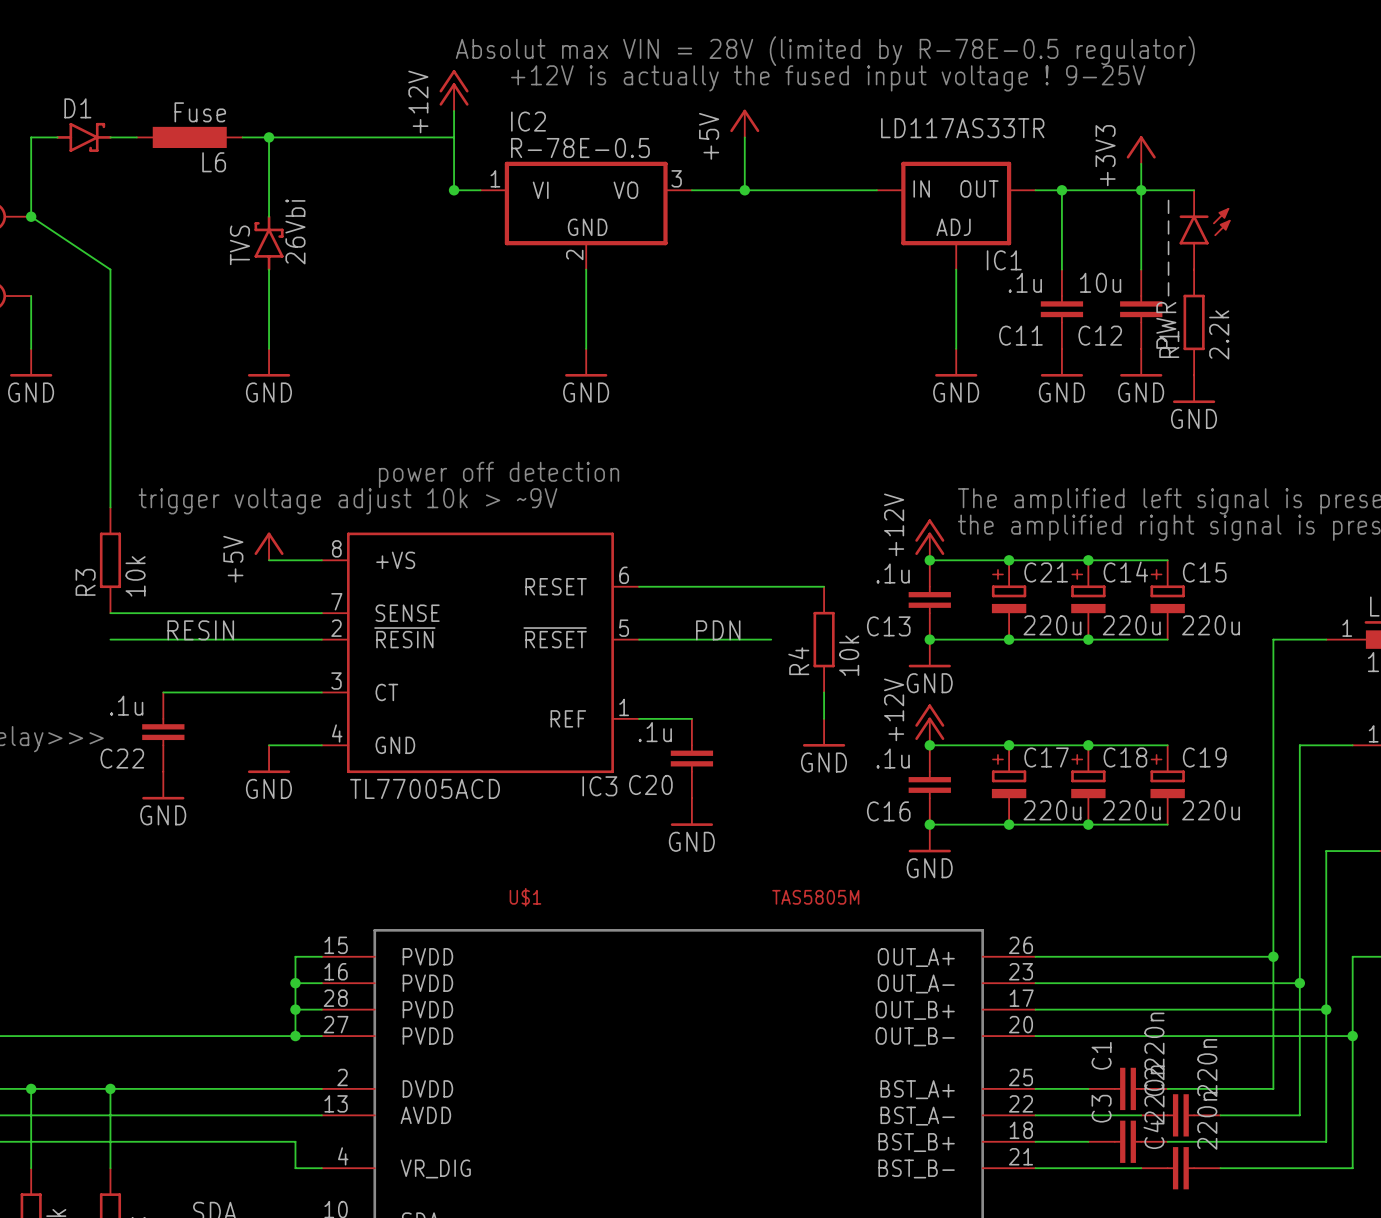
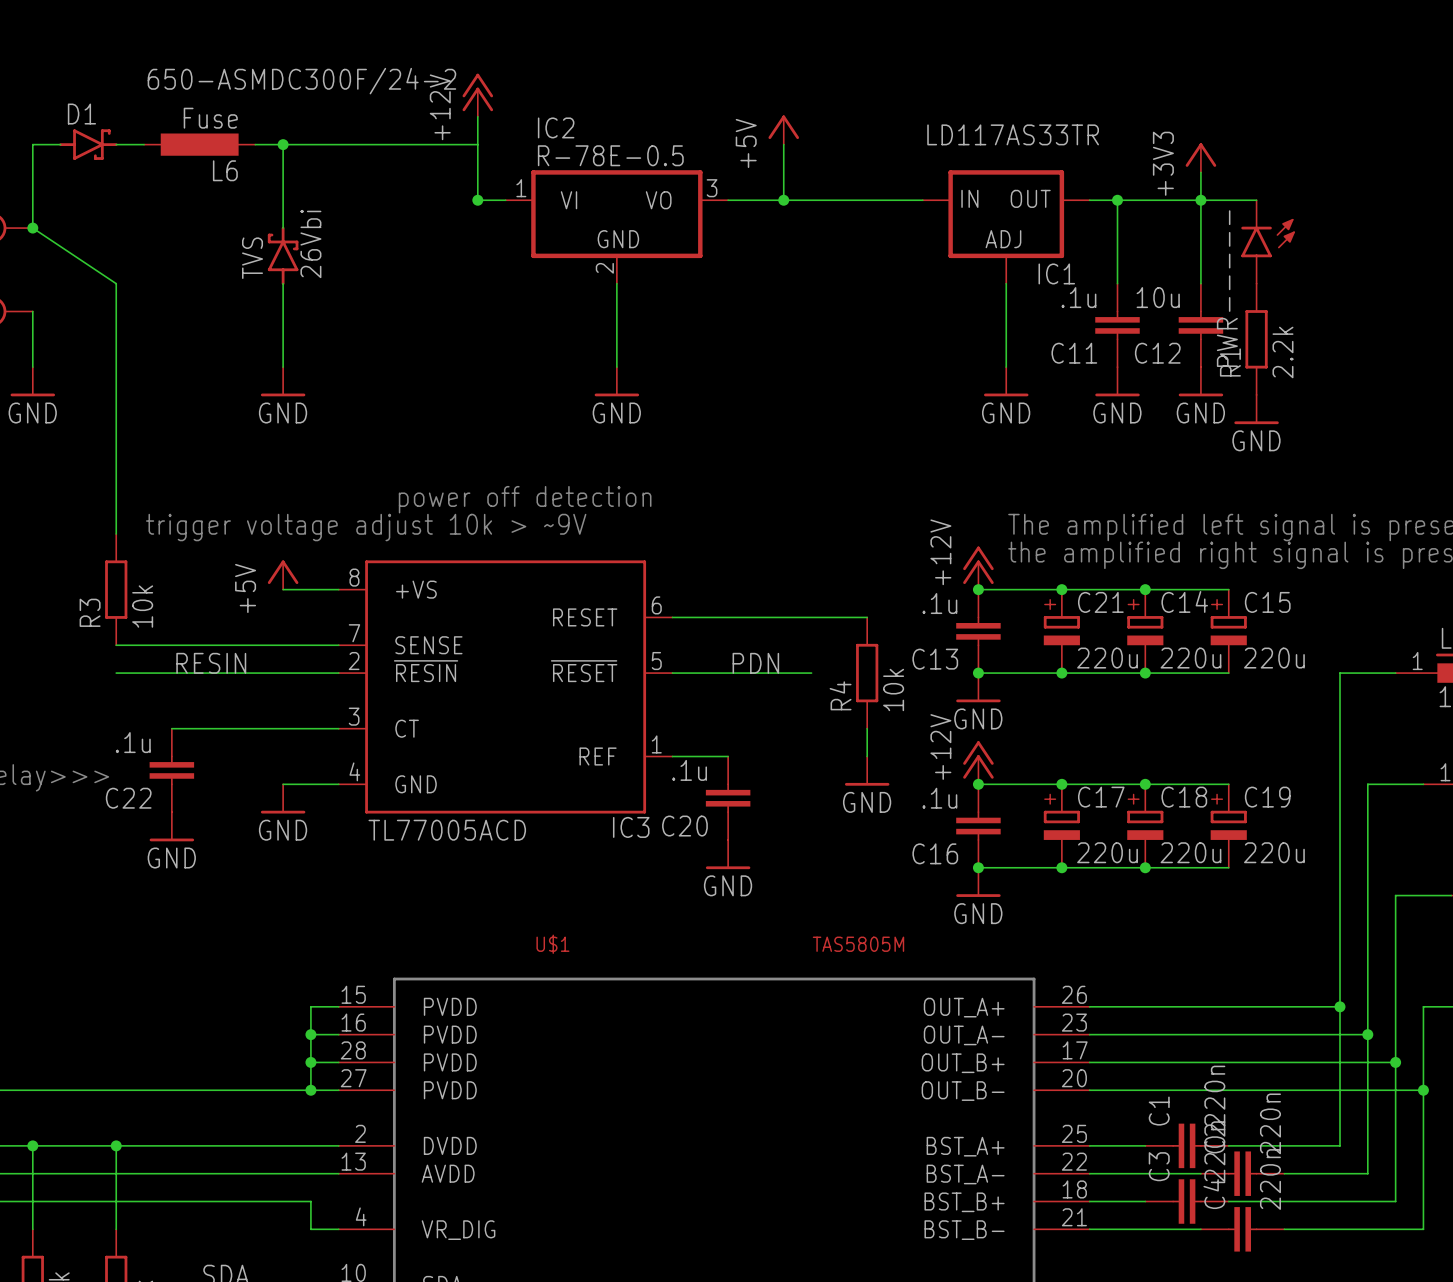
text: Absolut max VIN = 28V (limited by R-78E-0.5 regulator) (825, 51) -> none
L6 text: none -> 650-ASMDC300F/24-2 (301, 81)
text: +12V is actually the fused input voltage ! 9-25V (828, 78) -> none

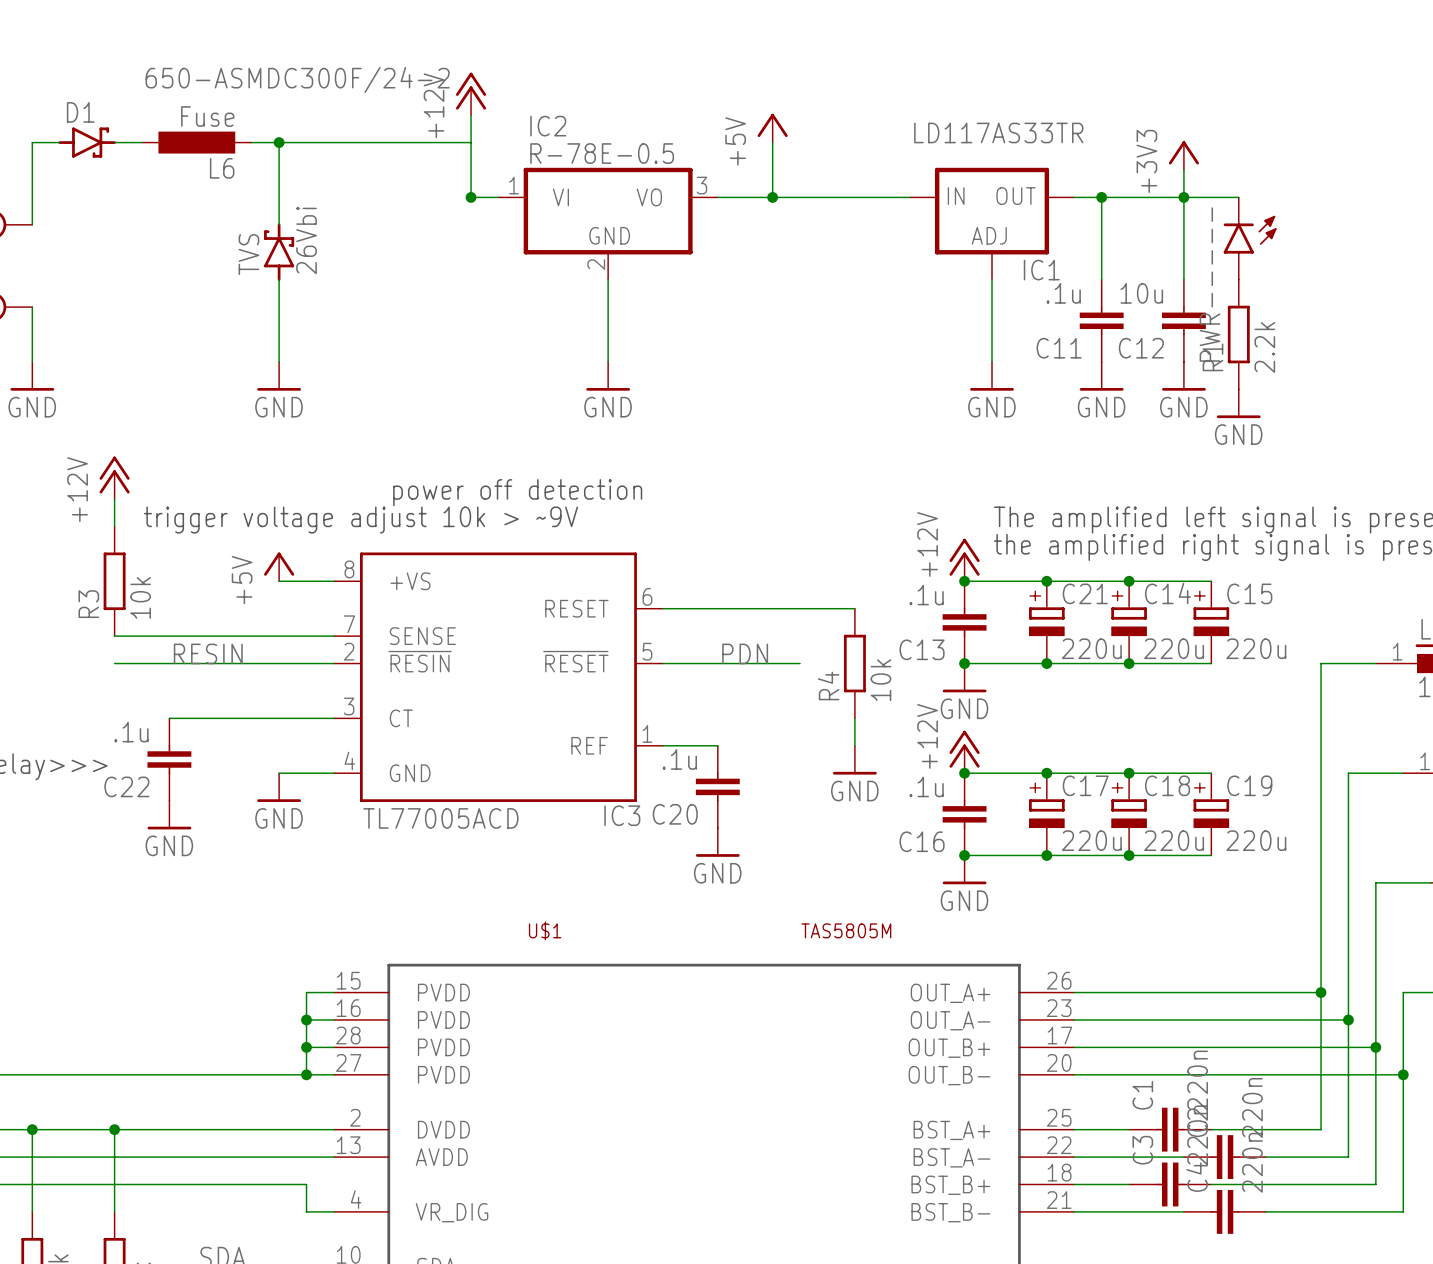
wire: (32, 228) (116, 283) (116, 506) -> none
junction: (32, 228) -> none
power symbol: none -> +12V (114, 477)

